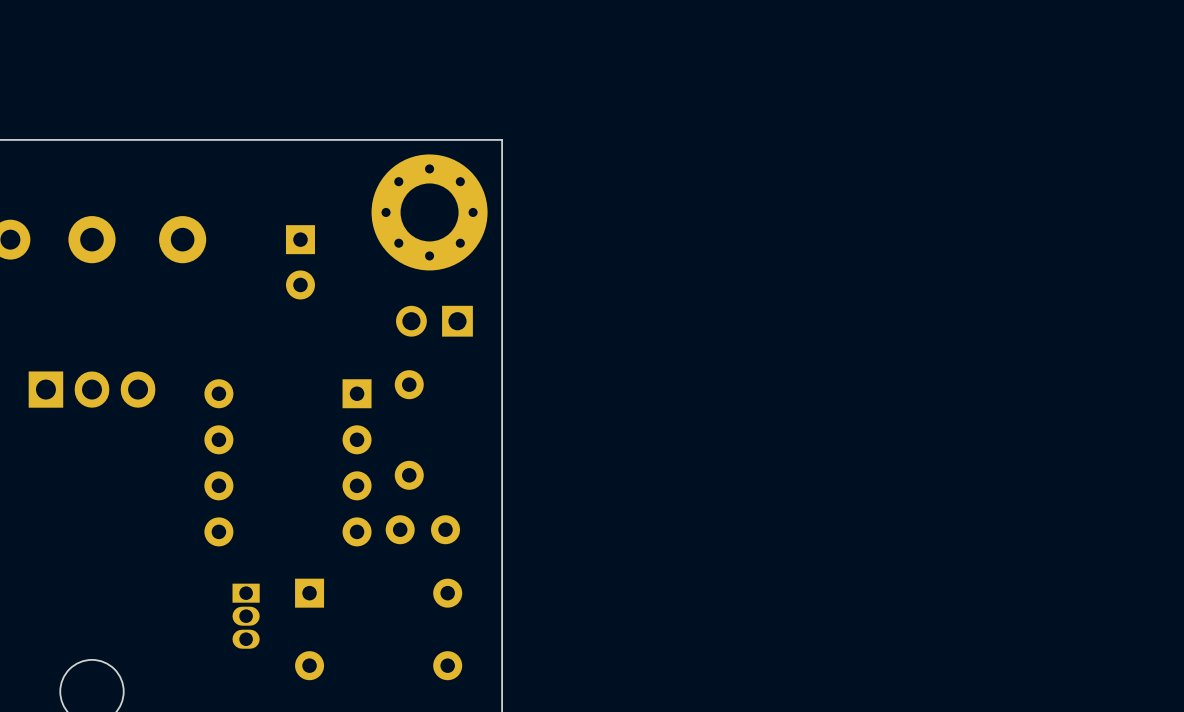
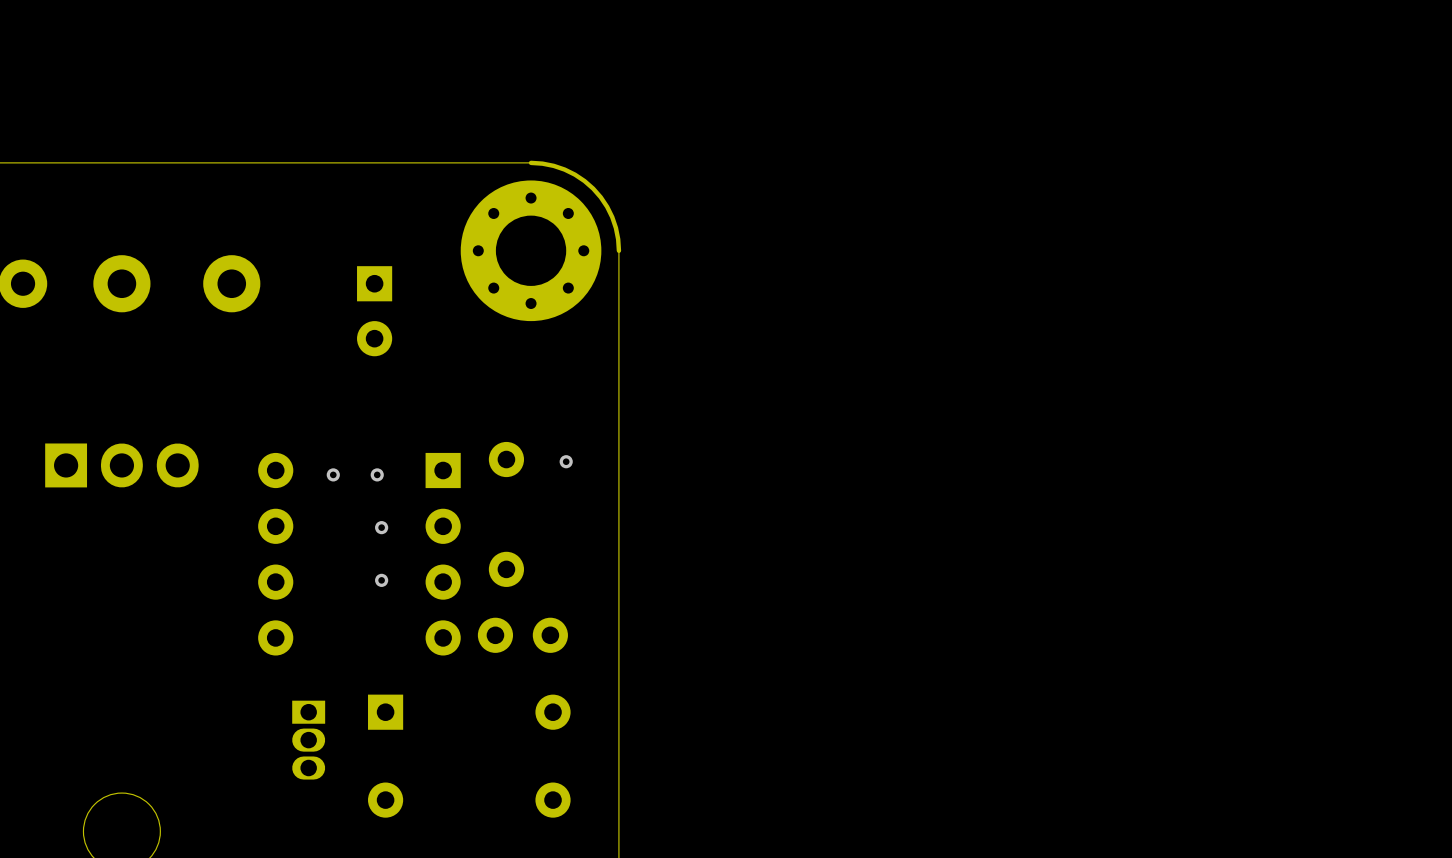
board edge: (429, 139) (502, 139) (502, 212) -> (531, 162) (542, 163) (564, 169) (584, 181) (593, 188) (600, 197) (612, 217) (618, 239) (618, 250)
part: (434, 321) -> none
via: none -> (566, 461)
via: none -> (333, 474)
via: none -> (377, 474)
via: none -> (381, 527)
via: none -> (381, 580)

